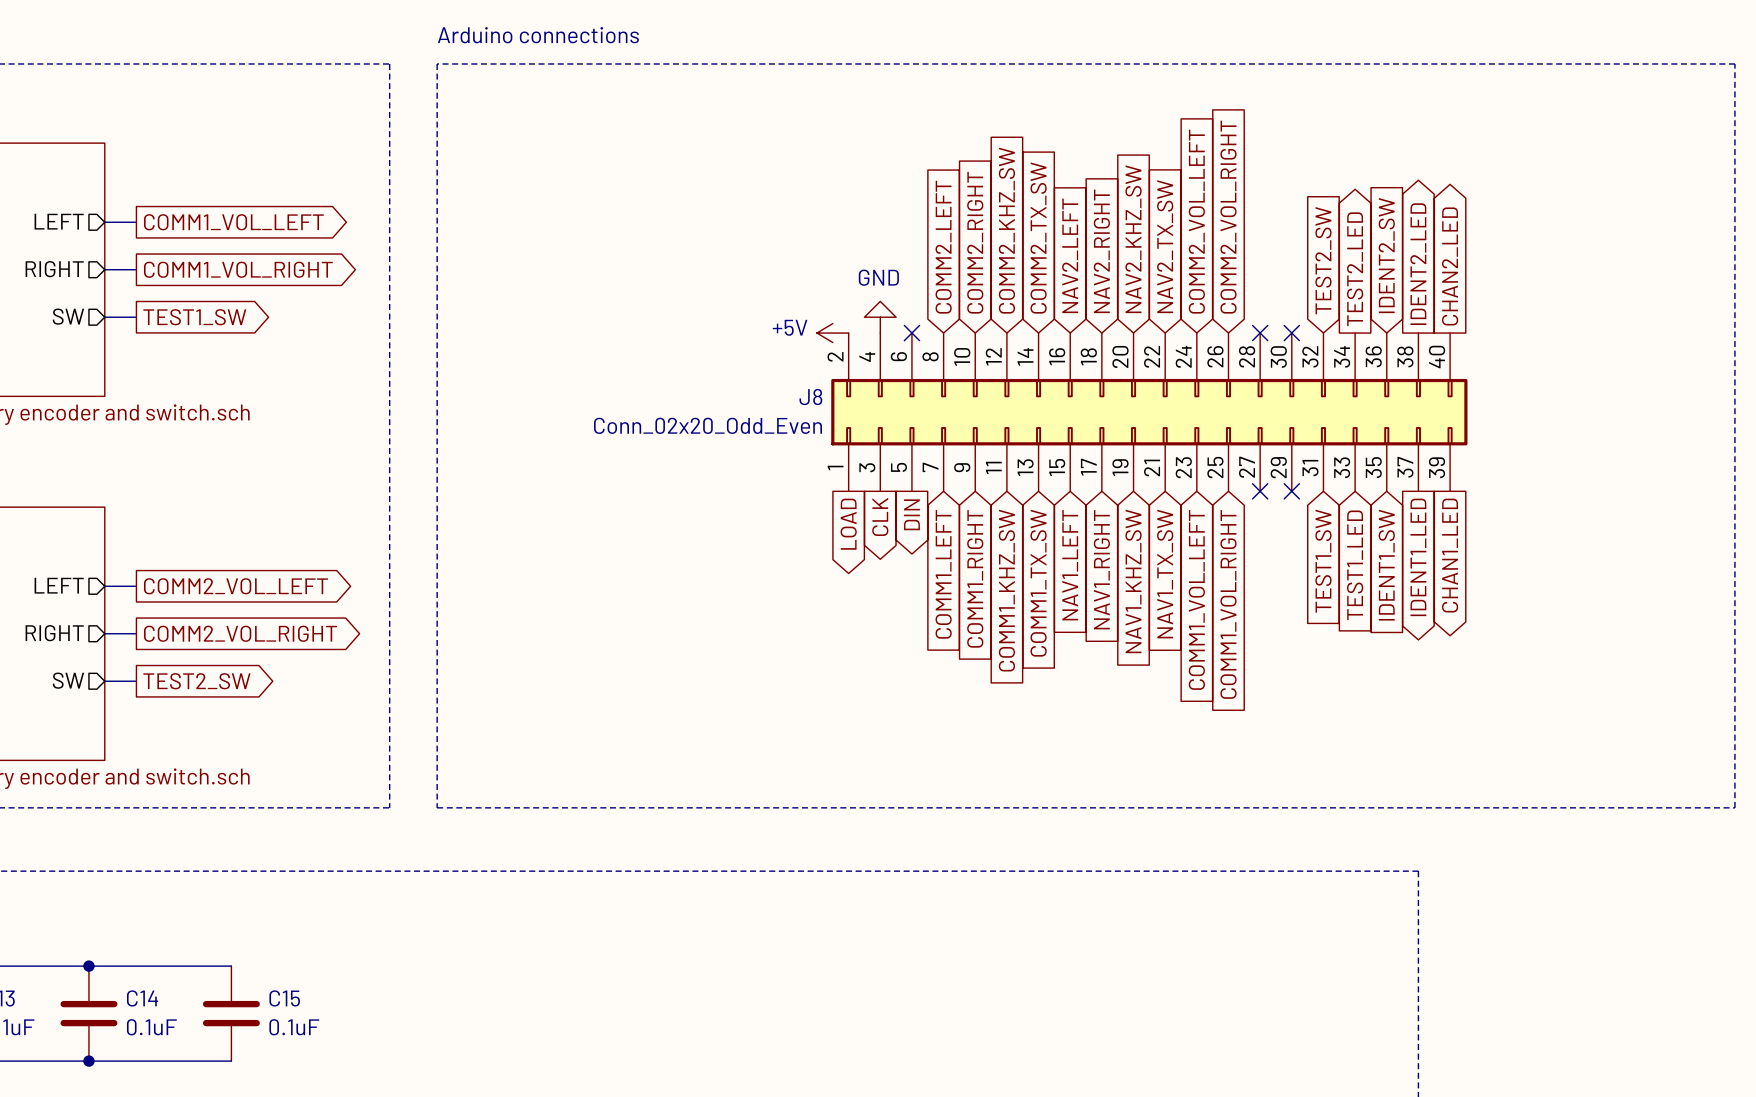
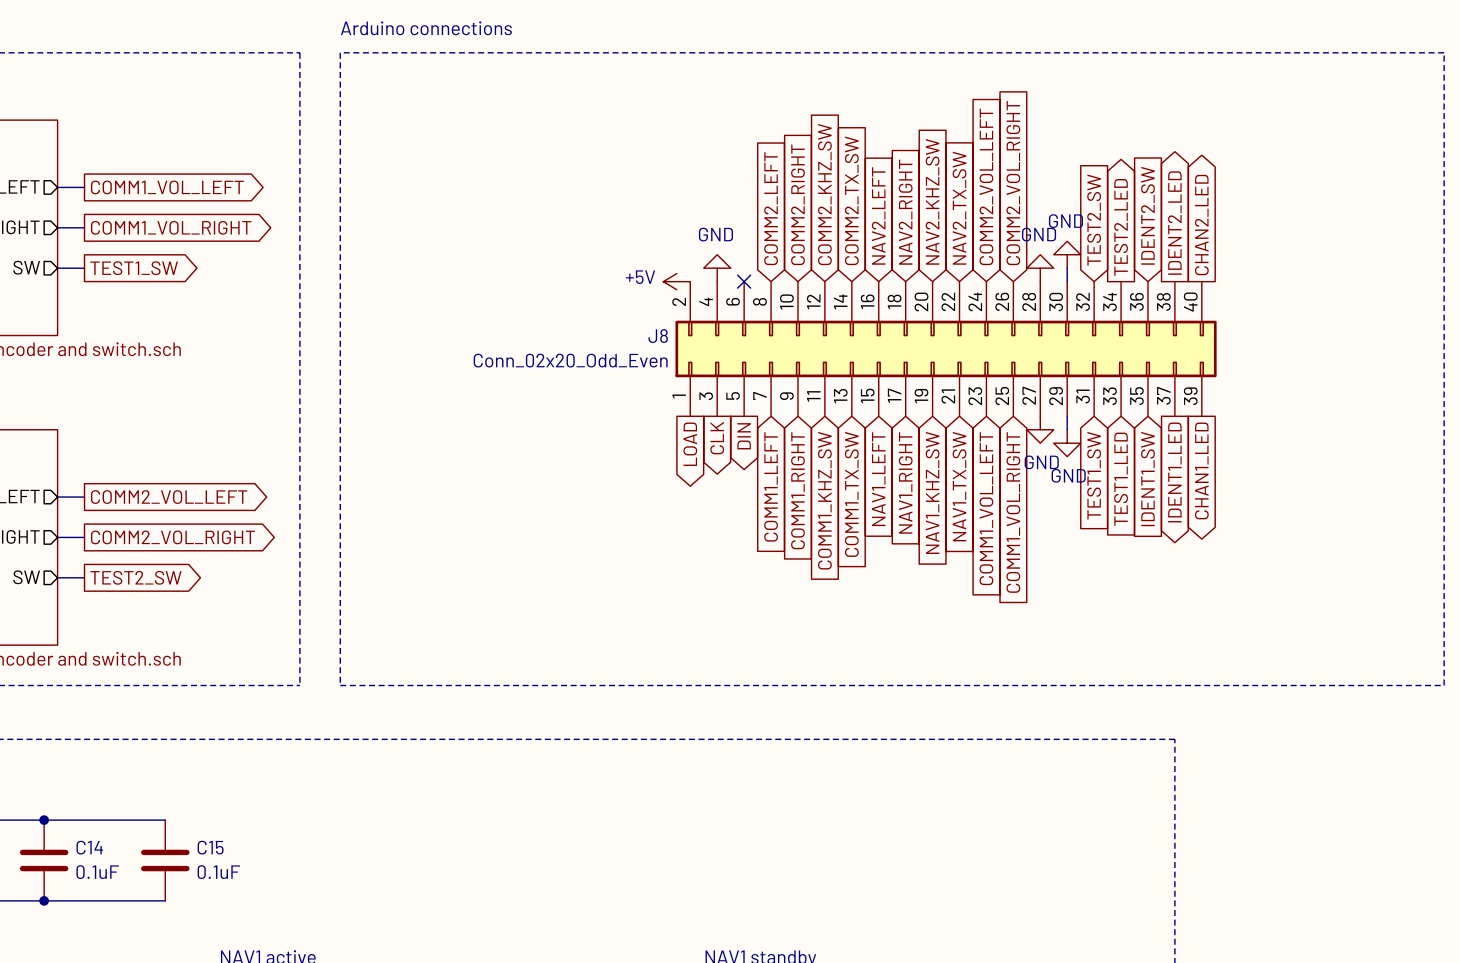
power symbol: none -> GND (1067, 254)
power symbol: none -> GND (1040, 268)
wire: none -> (1067, 268) (1067, 281)
no-connect mark: (1260, 333) -> none
no-connect mark: (1291, 333) -> none
no-connect mark: (1260, 491) -> none
wire: none -> (1067, 416) (1067, 429)
no-connect mark: (1291, 491) -> none
power symbol: none -> GND (1040, 429)
power symbol: none -> GND (1067, 443)

